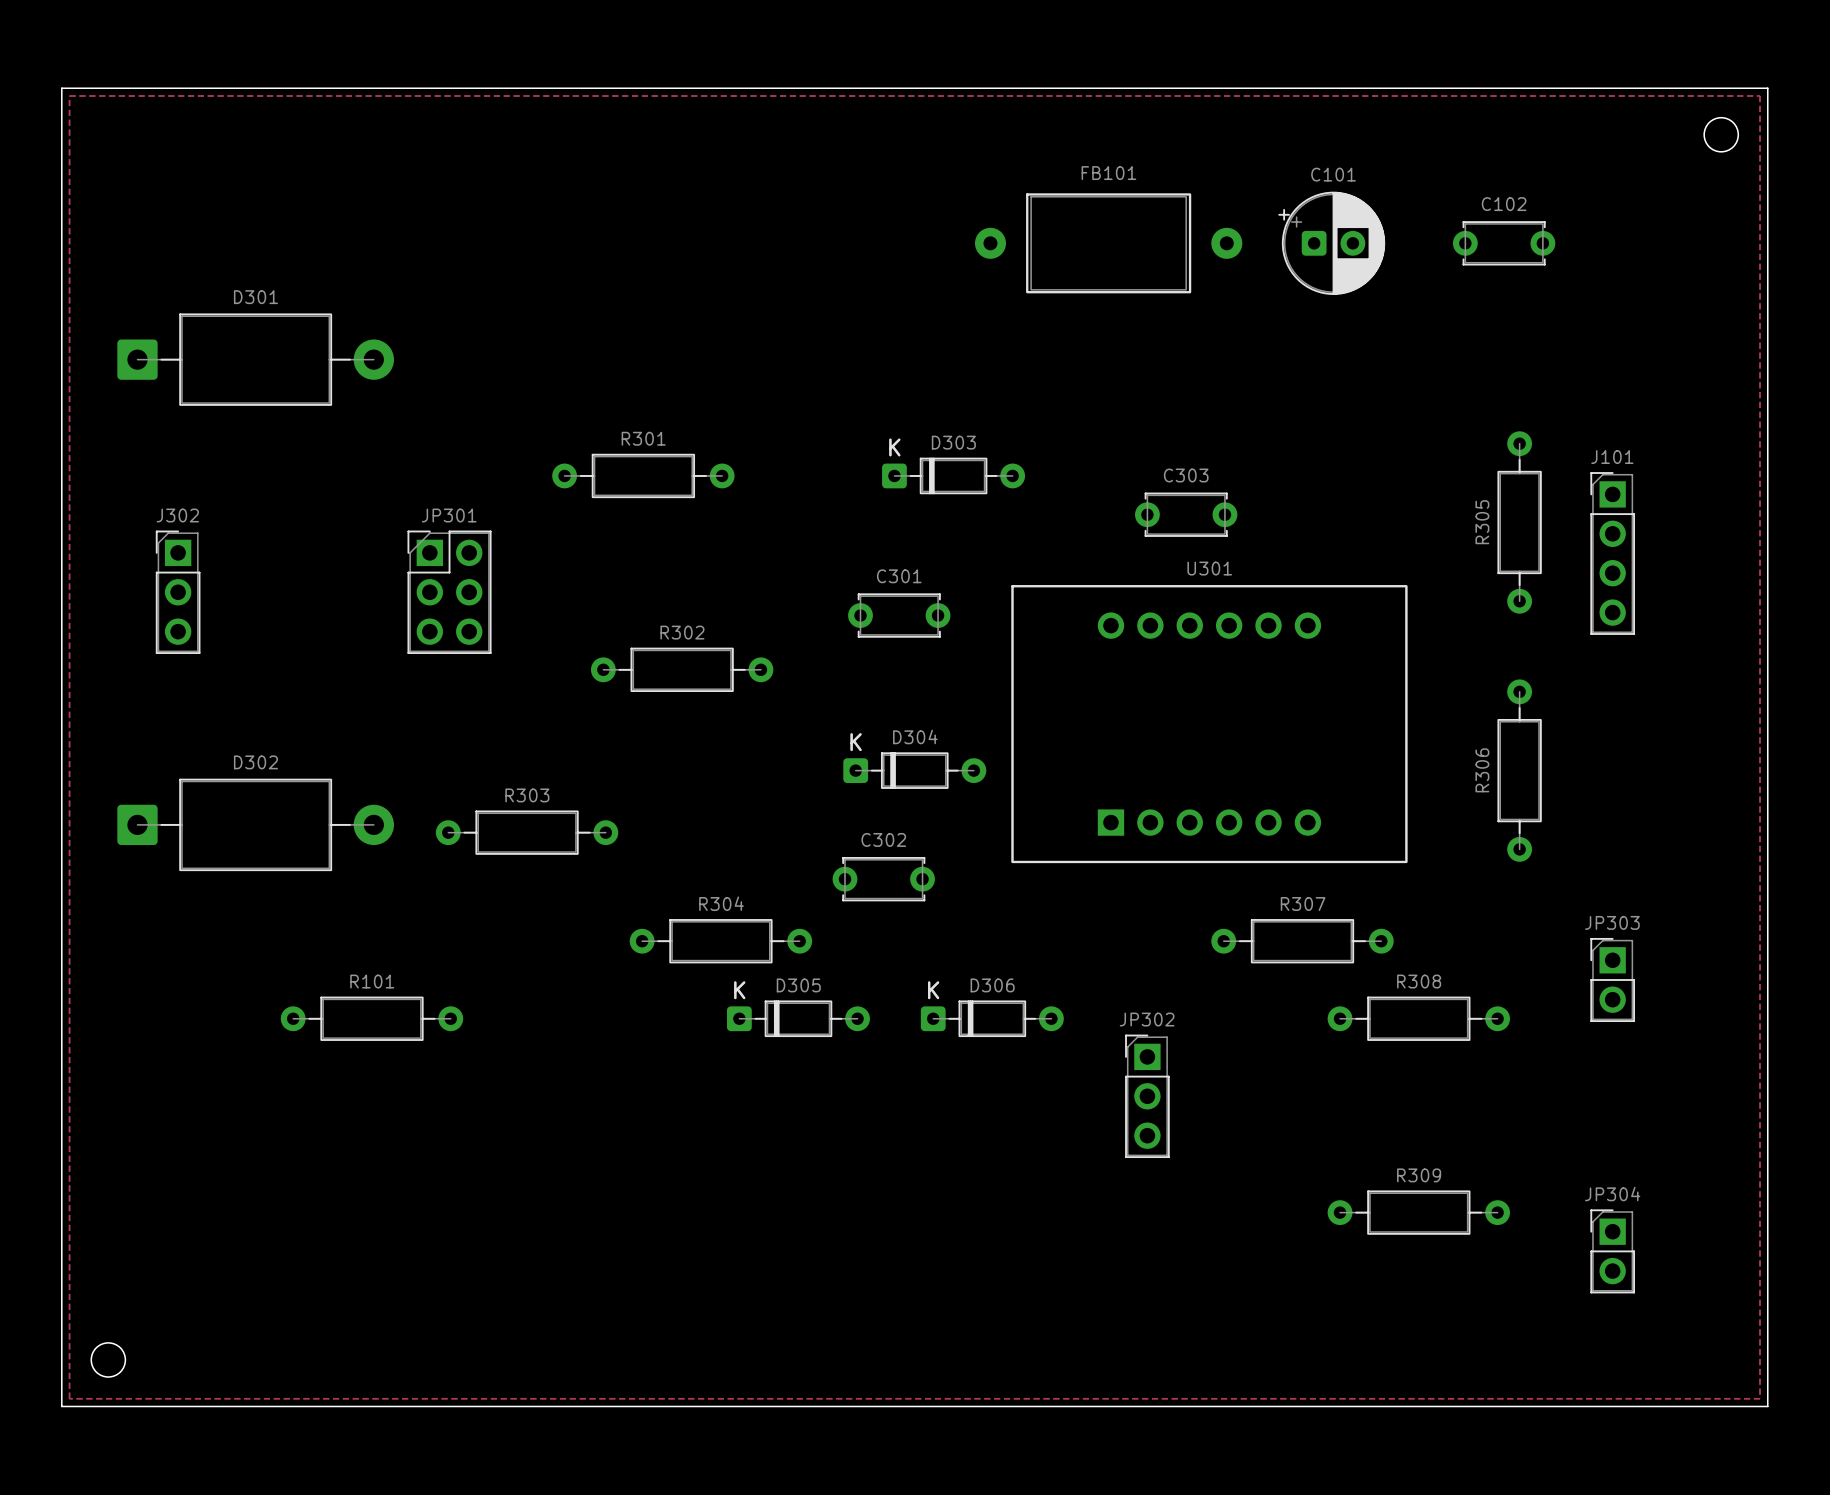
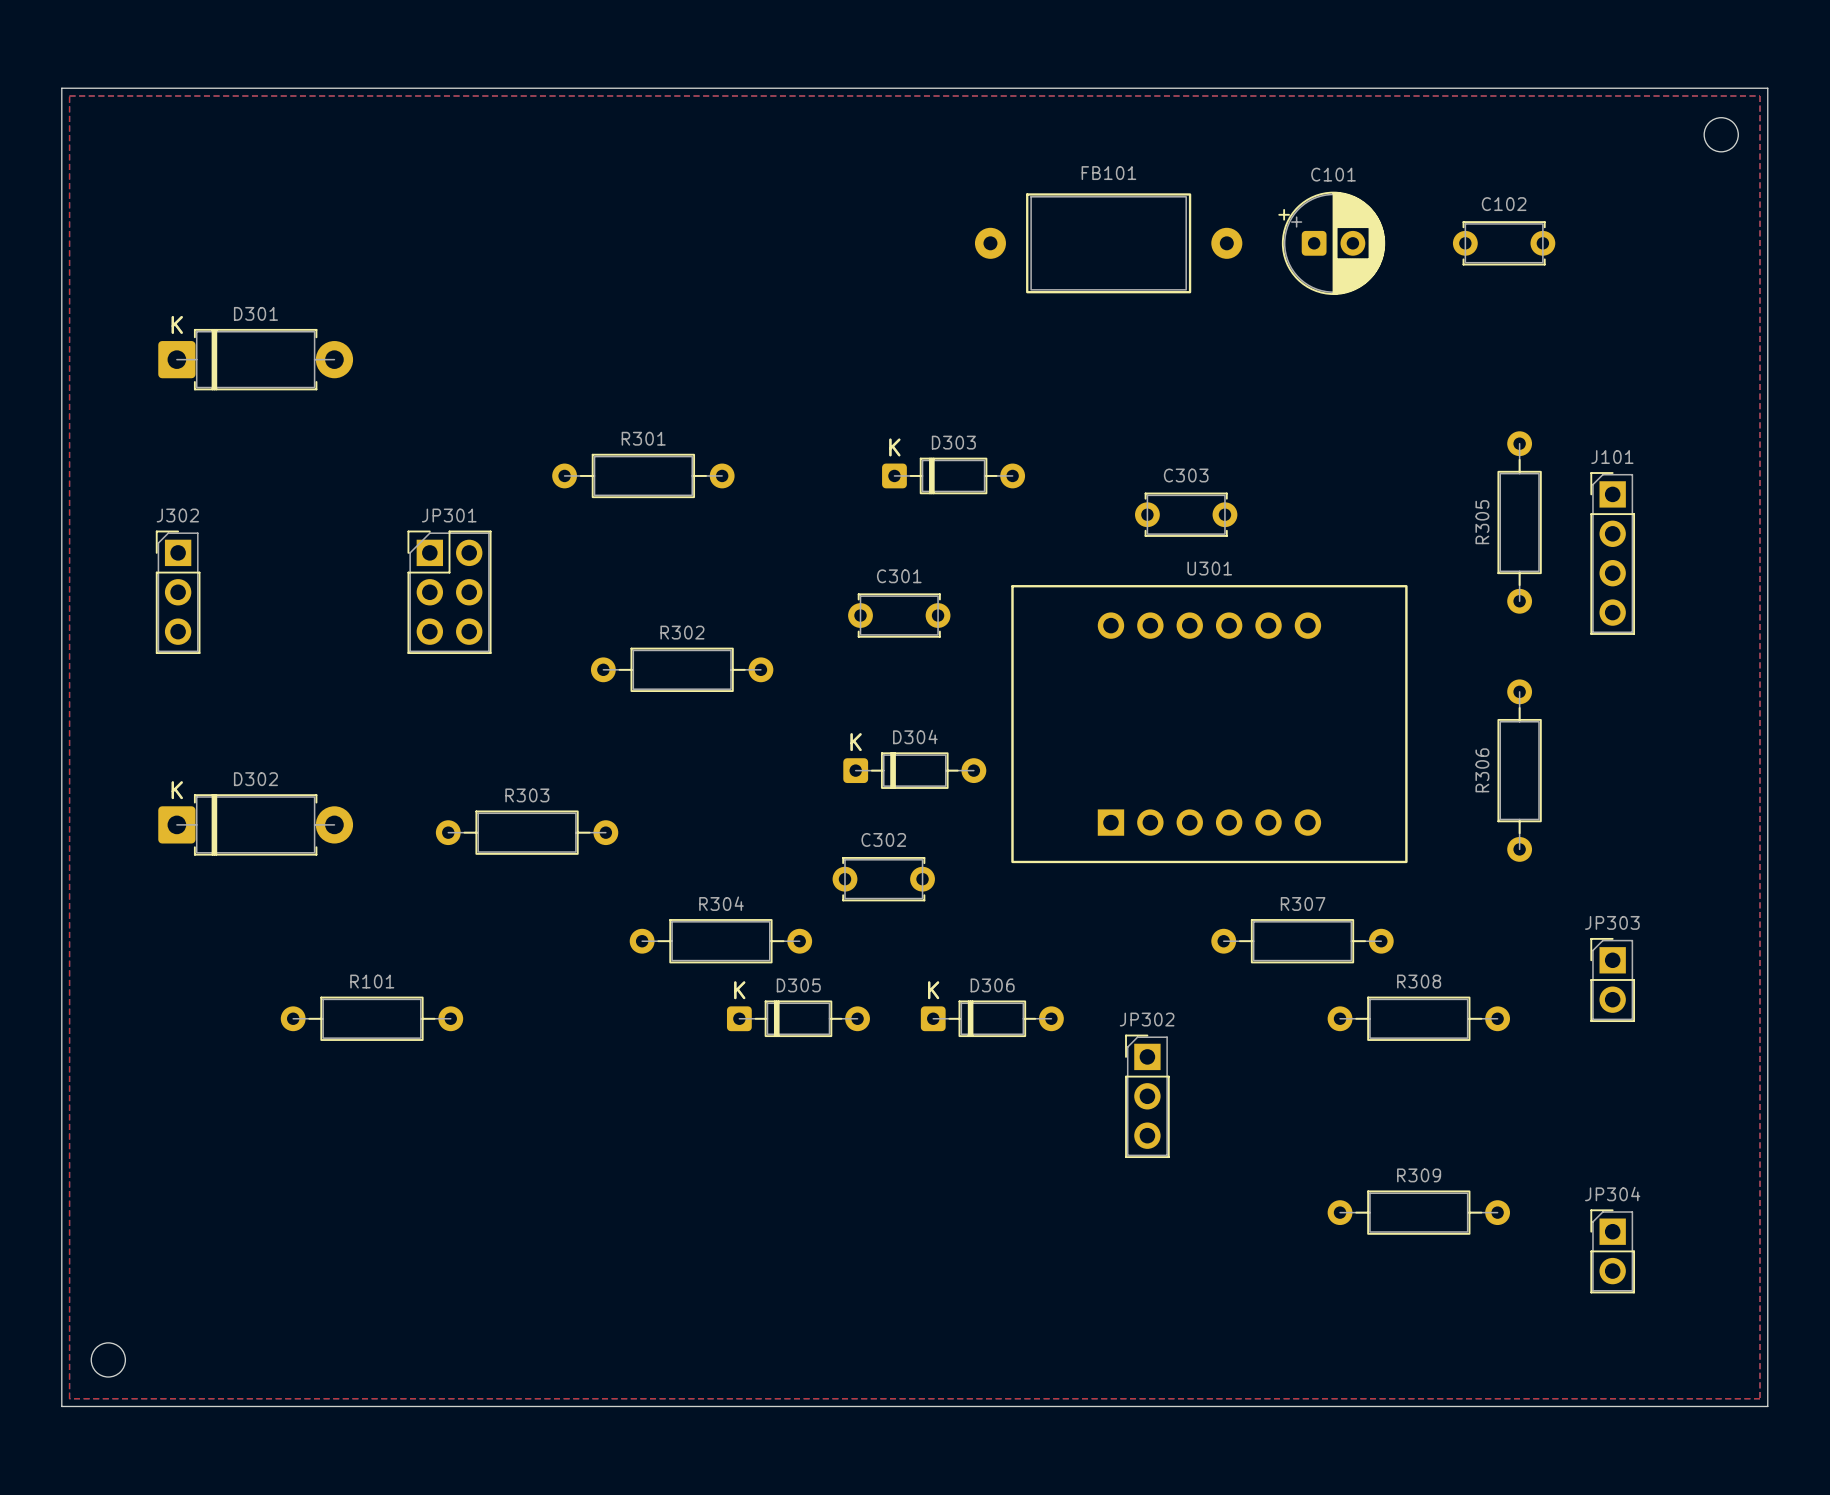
D301 footprint: [117, 313, 395, 406] -> [158, 328, 354, 391]
D302 footprint: [117, 778, 395, 872] -> [158, 794, 354, 856]

